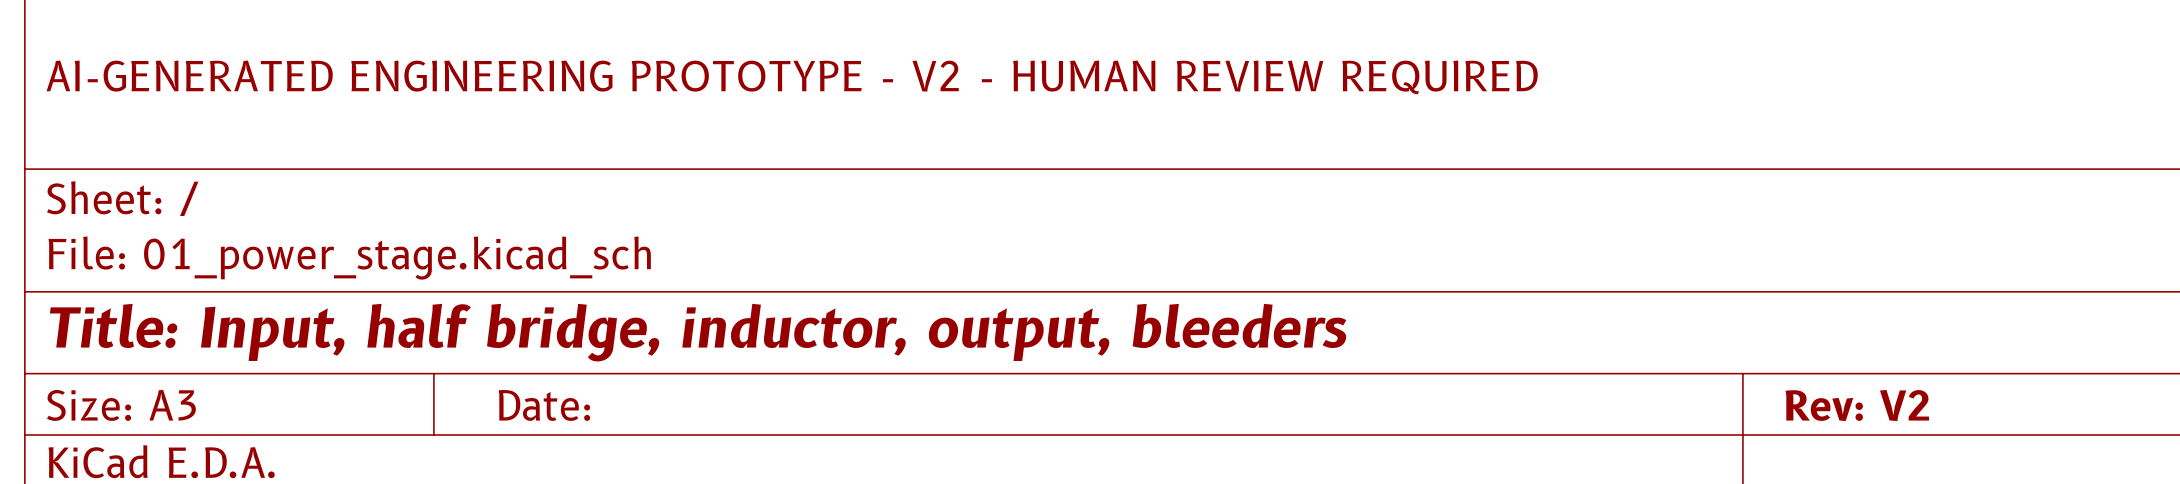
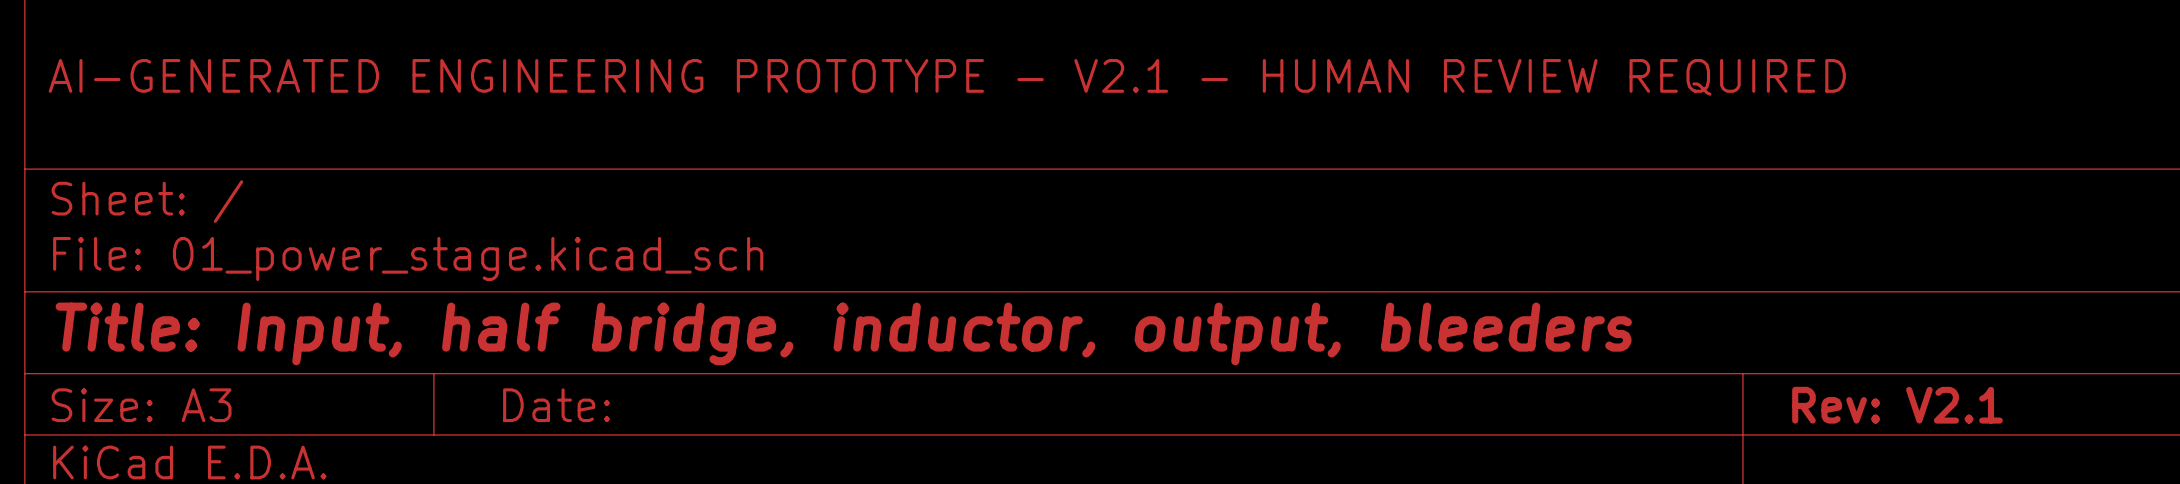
title block: AI-GENERATED ENGINEERING PROTOTYPE - V2 - HUMAN REVIEW REQUIRED (792, 77) -> AI-GENERATED ENGINEERING PROTOTYPE - V2.1 - HUMAN REVIEW REQUIRED (947, 77)
title block: Rev: V2 (1857, 405) -> Rev: V2.1 (1897, 405)

